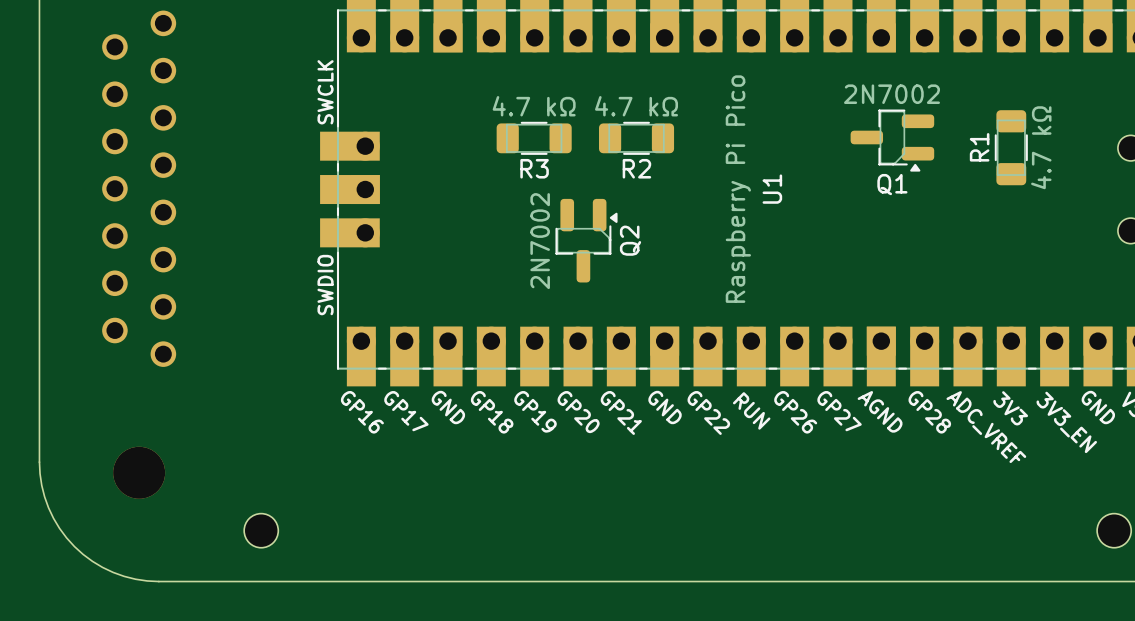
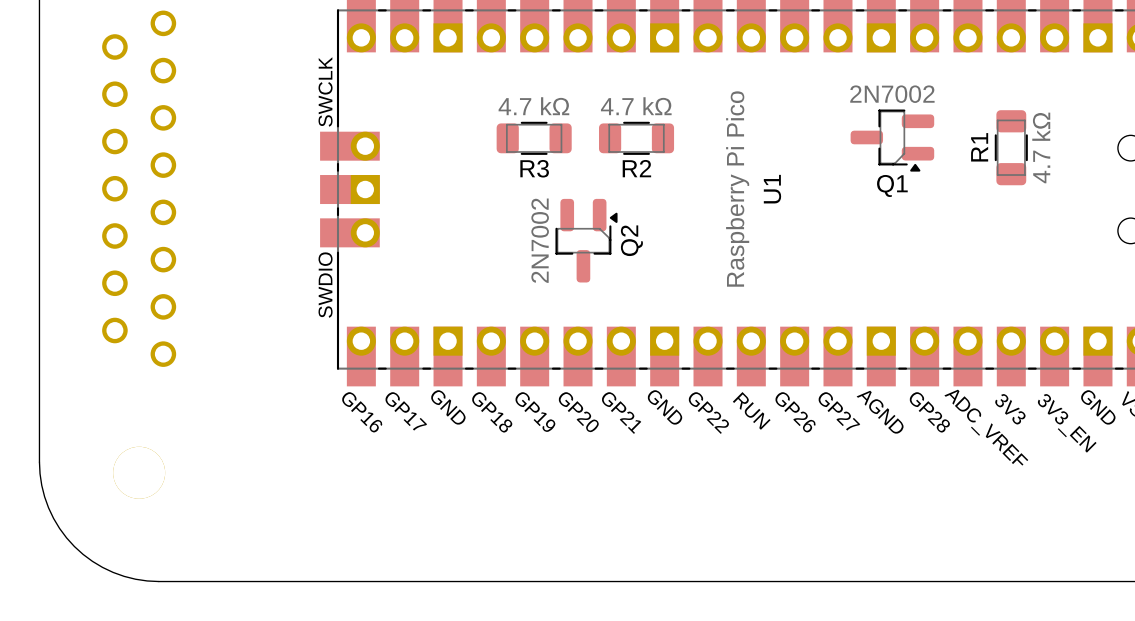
part: (261, 530) -> none
part: (1114, 530) -> none

